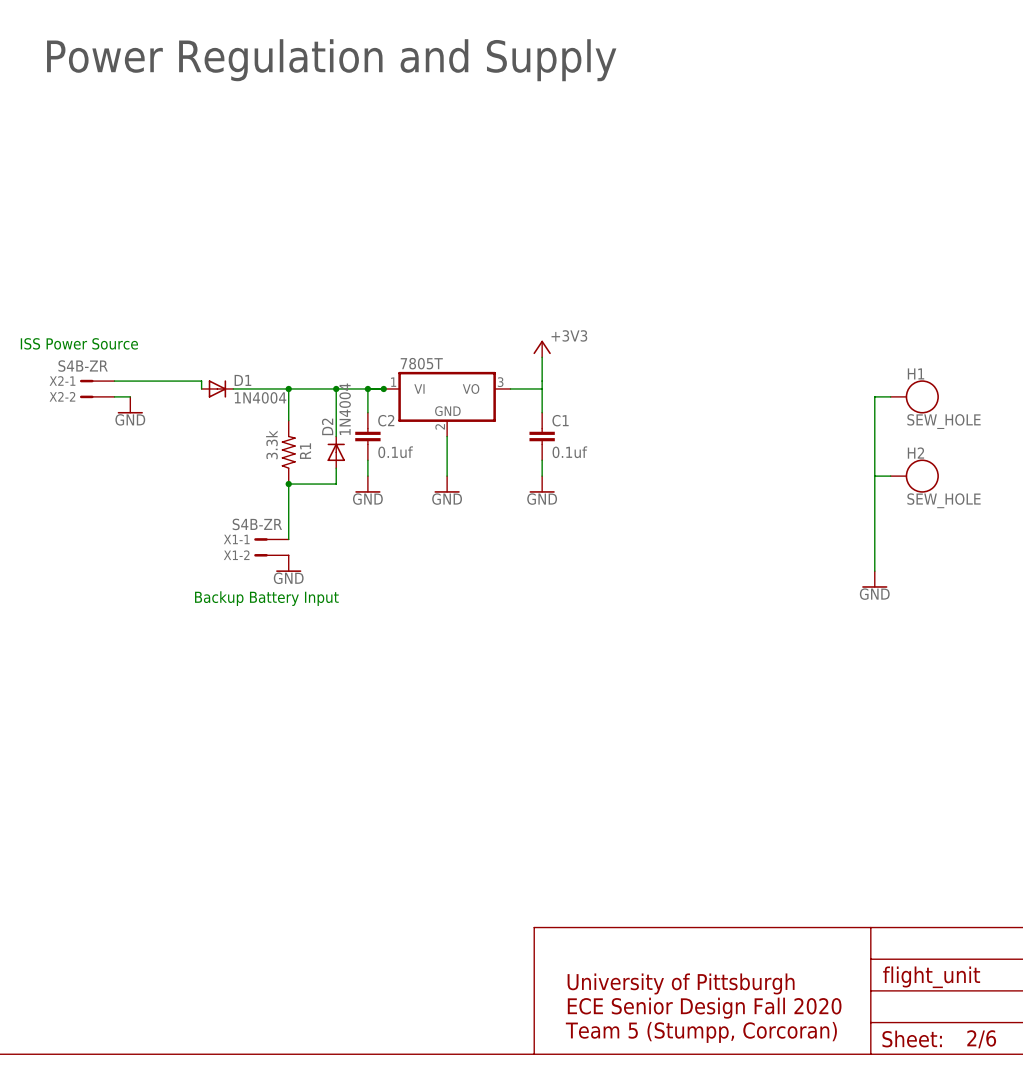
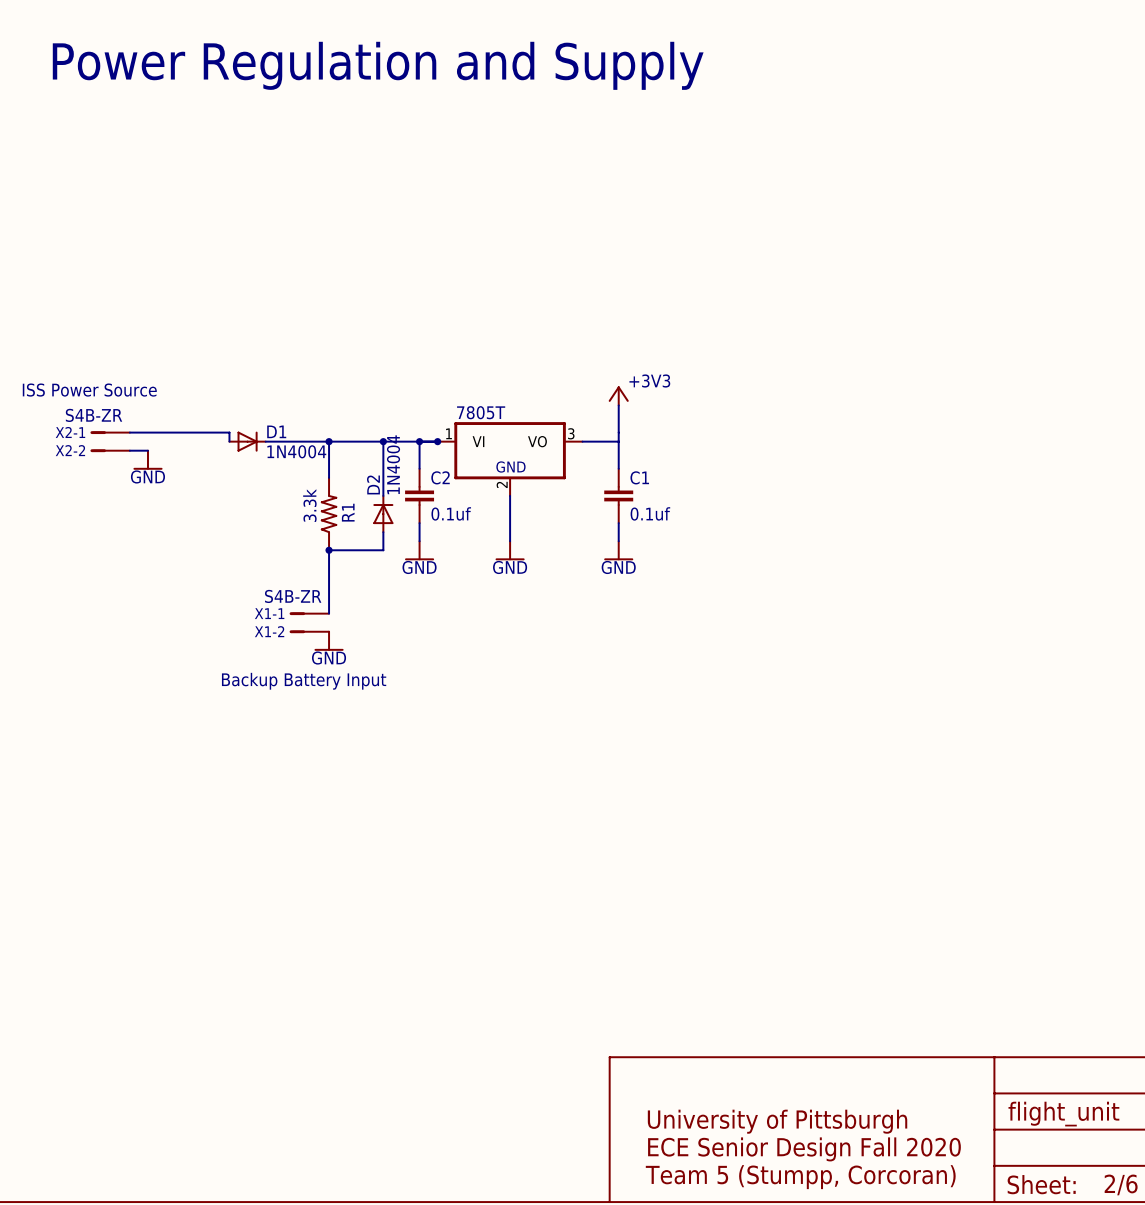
wire: (890, 396) (874, 396) (874, 571) -> none
H1: SEW_HOLE (914, 396) -> none
wire: (874, 476) (890, 476) -> none
H2: SEW_HOLE (914, 476) -> none
power symbol: GND (874, 579) -> none

